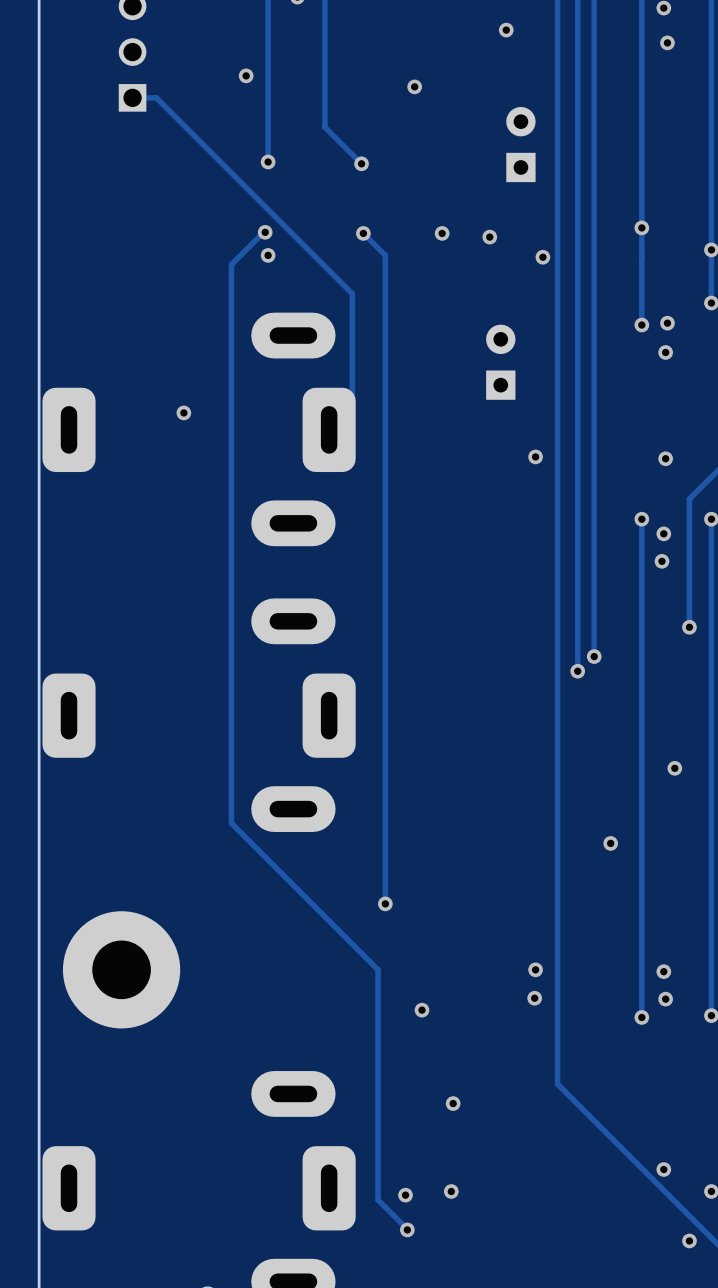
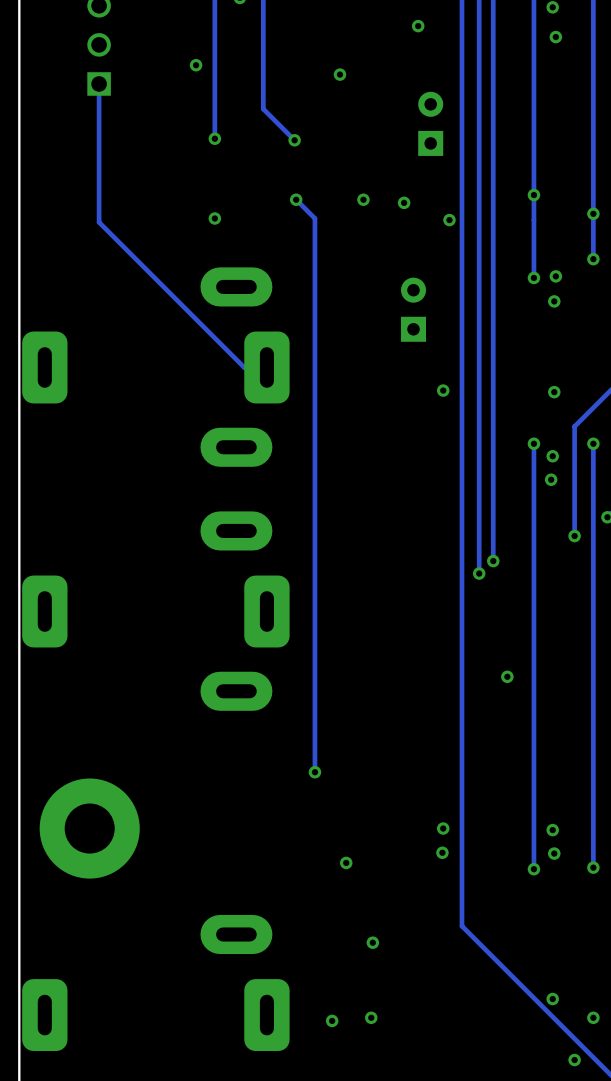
track: (132, 97) (156, 97) (352, 293) (352, 406) (329, 429) -> (99, 83) (99, 222) (244, 367) (266, 367)
track: (265, 232) (231, 264) (231, 823) (378, 969) (378, 1199) (407, 1229) -> none
via: (265, 232) -> none
via: (183, 412) -> none
via: (674, 768) -> none
via: none -> (507, 676)
via: (610, 843) -> none
via: (407, 1229) -> none

